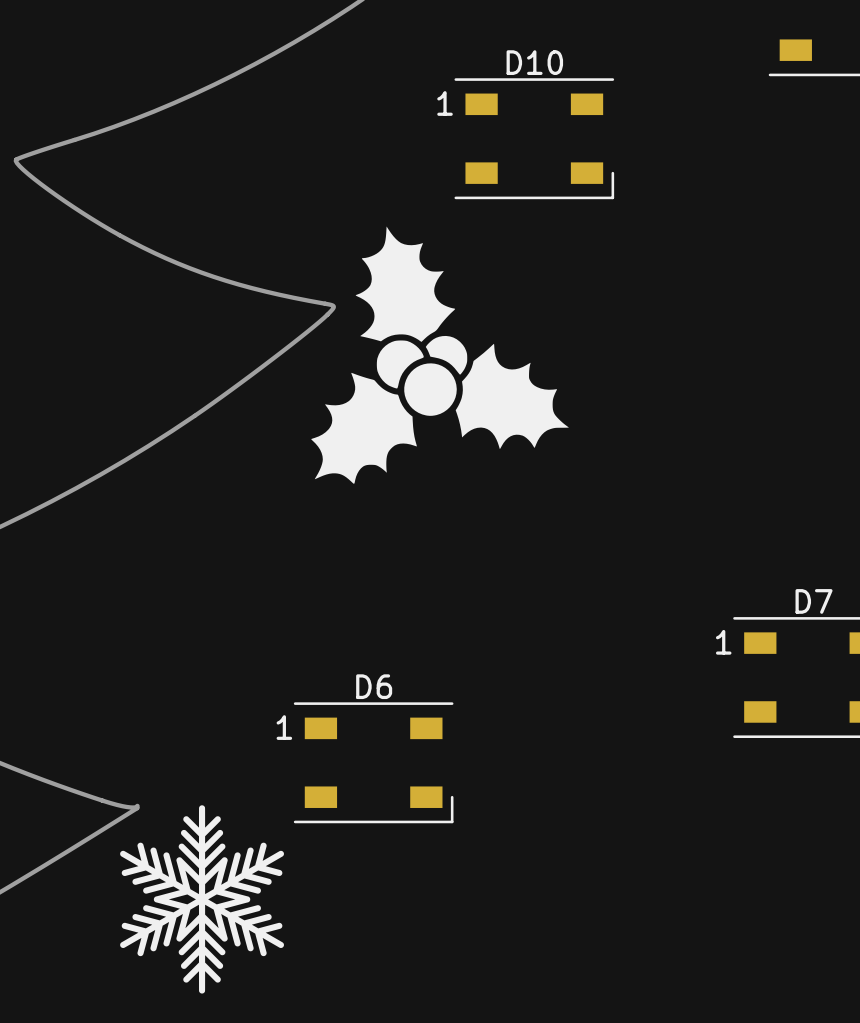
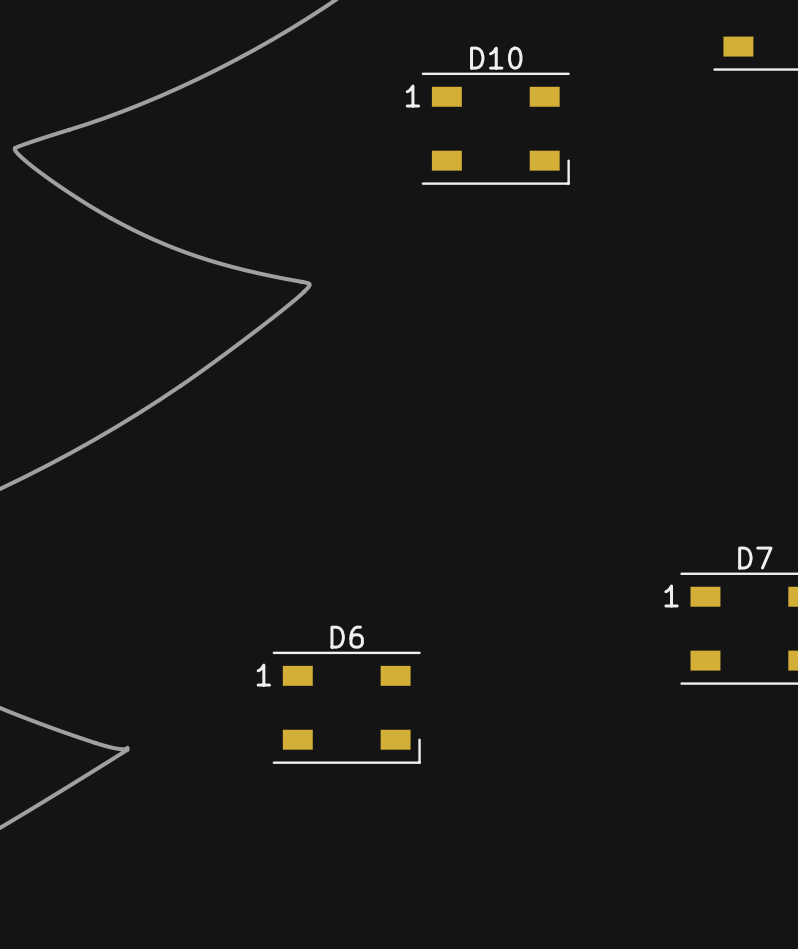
drawing: [311, 226, 569, 484] -> none
drawing: [120, 805, 284, 994] -> none

